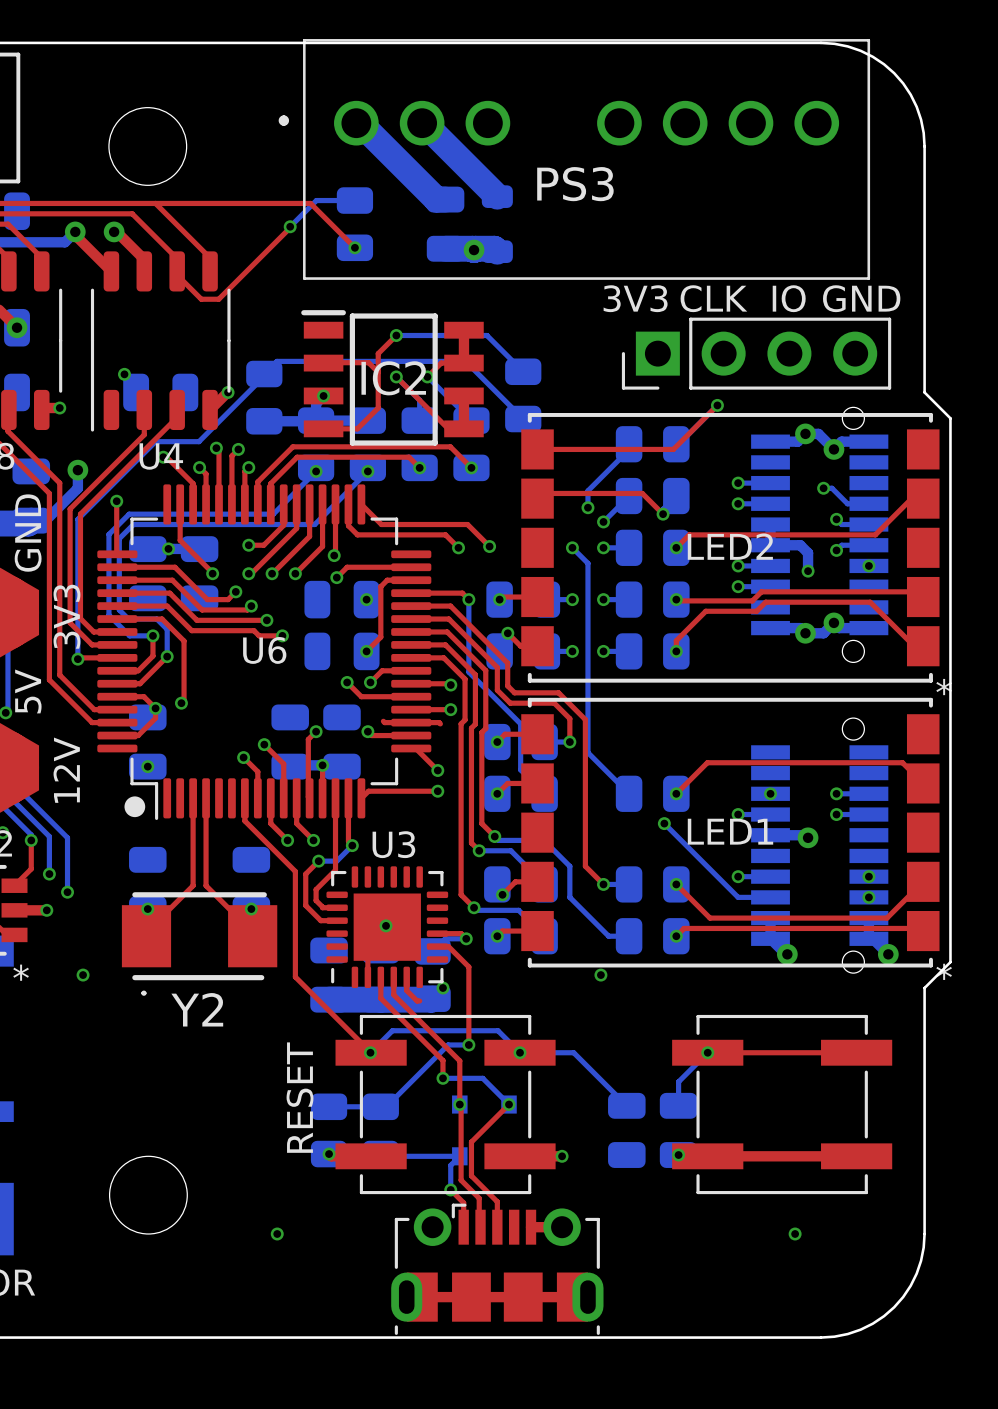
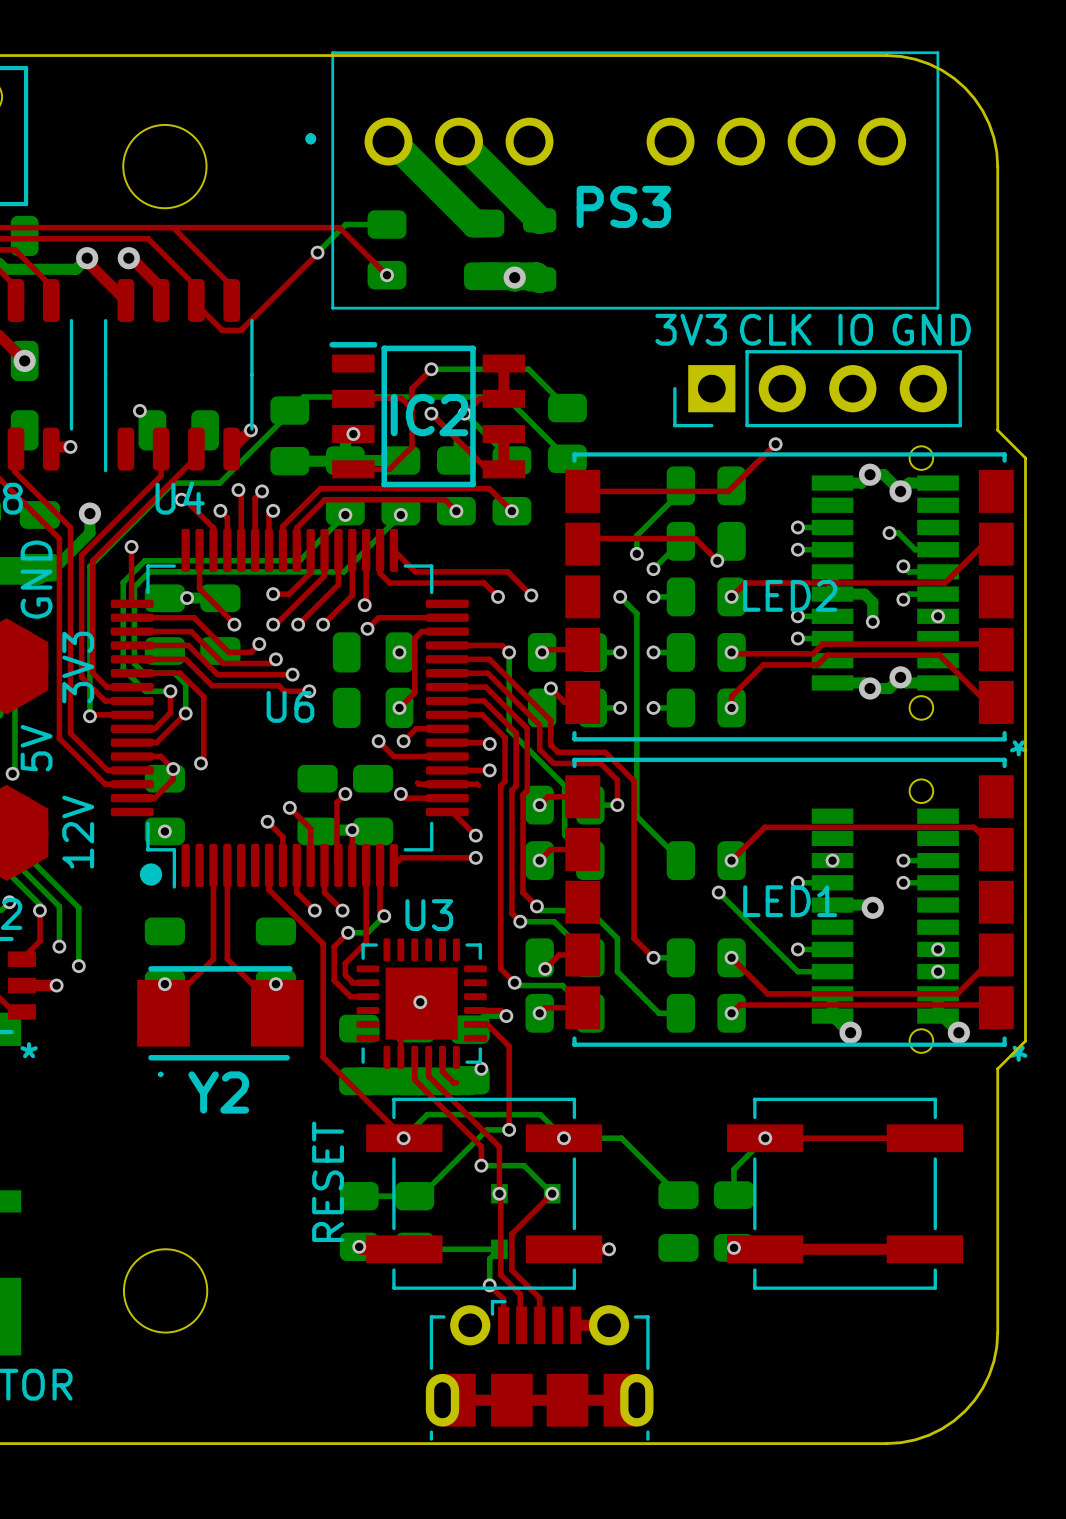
via: (83, 975) -> none
via: (600, 975) -> none
via: (277, 1233) -> none
via: (795, 1233) -> none

